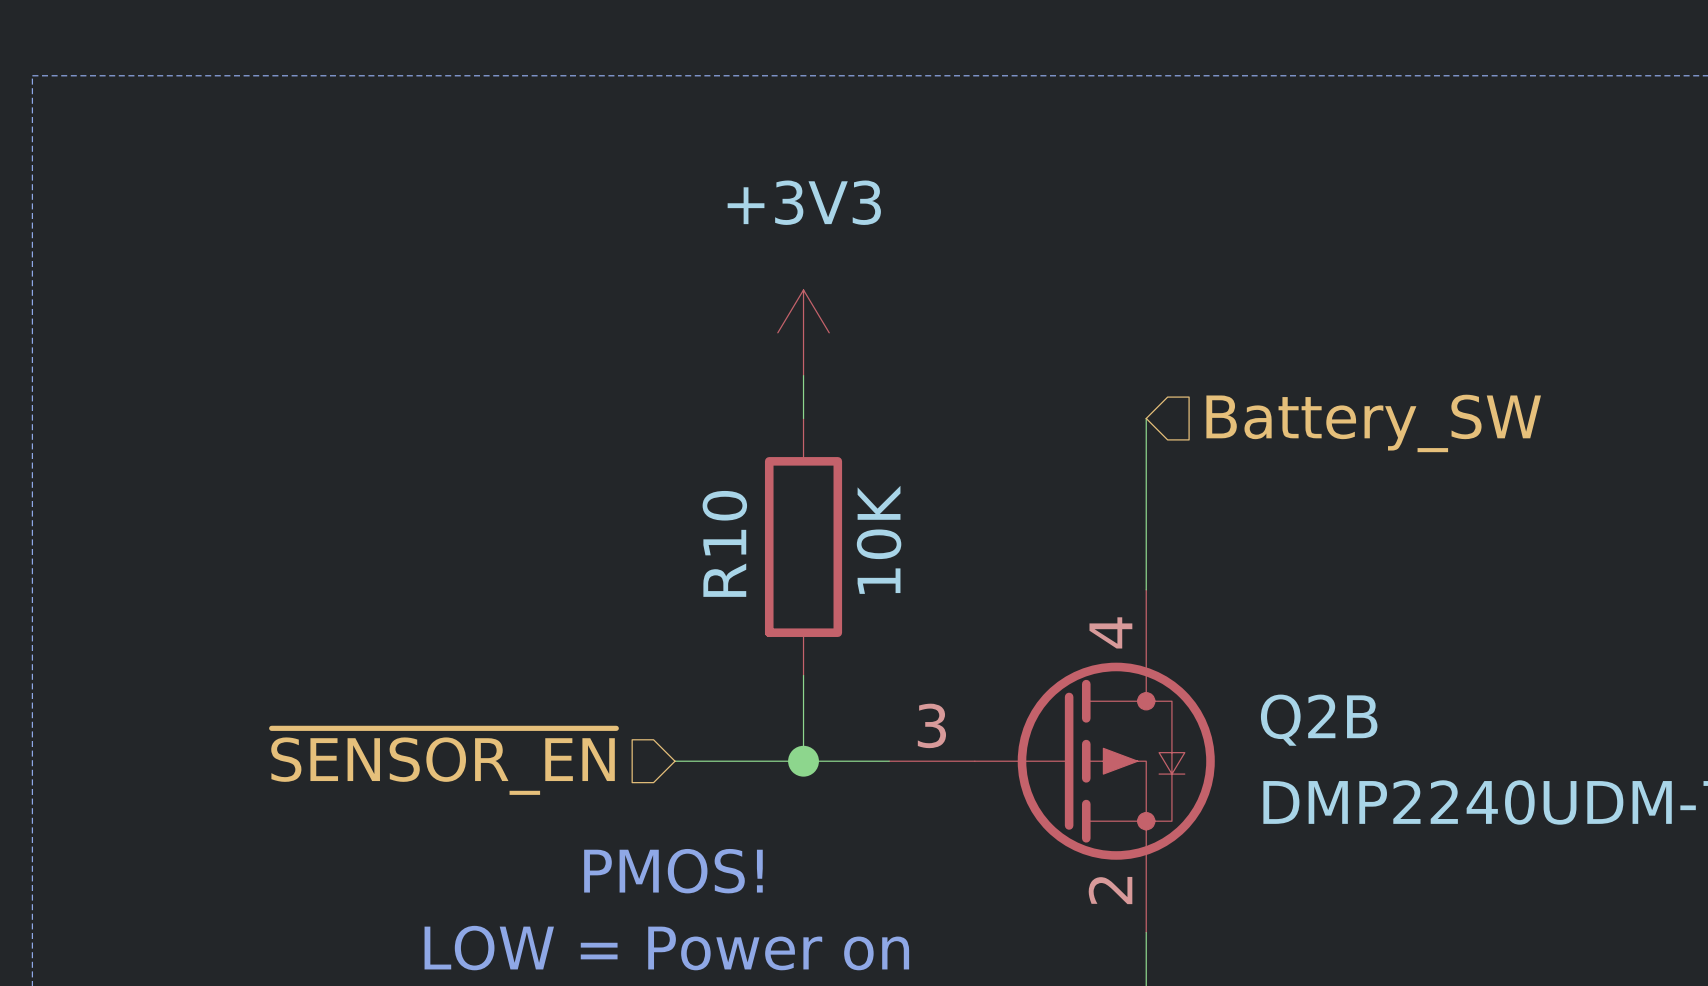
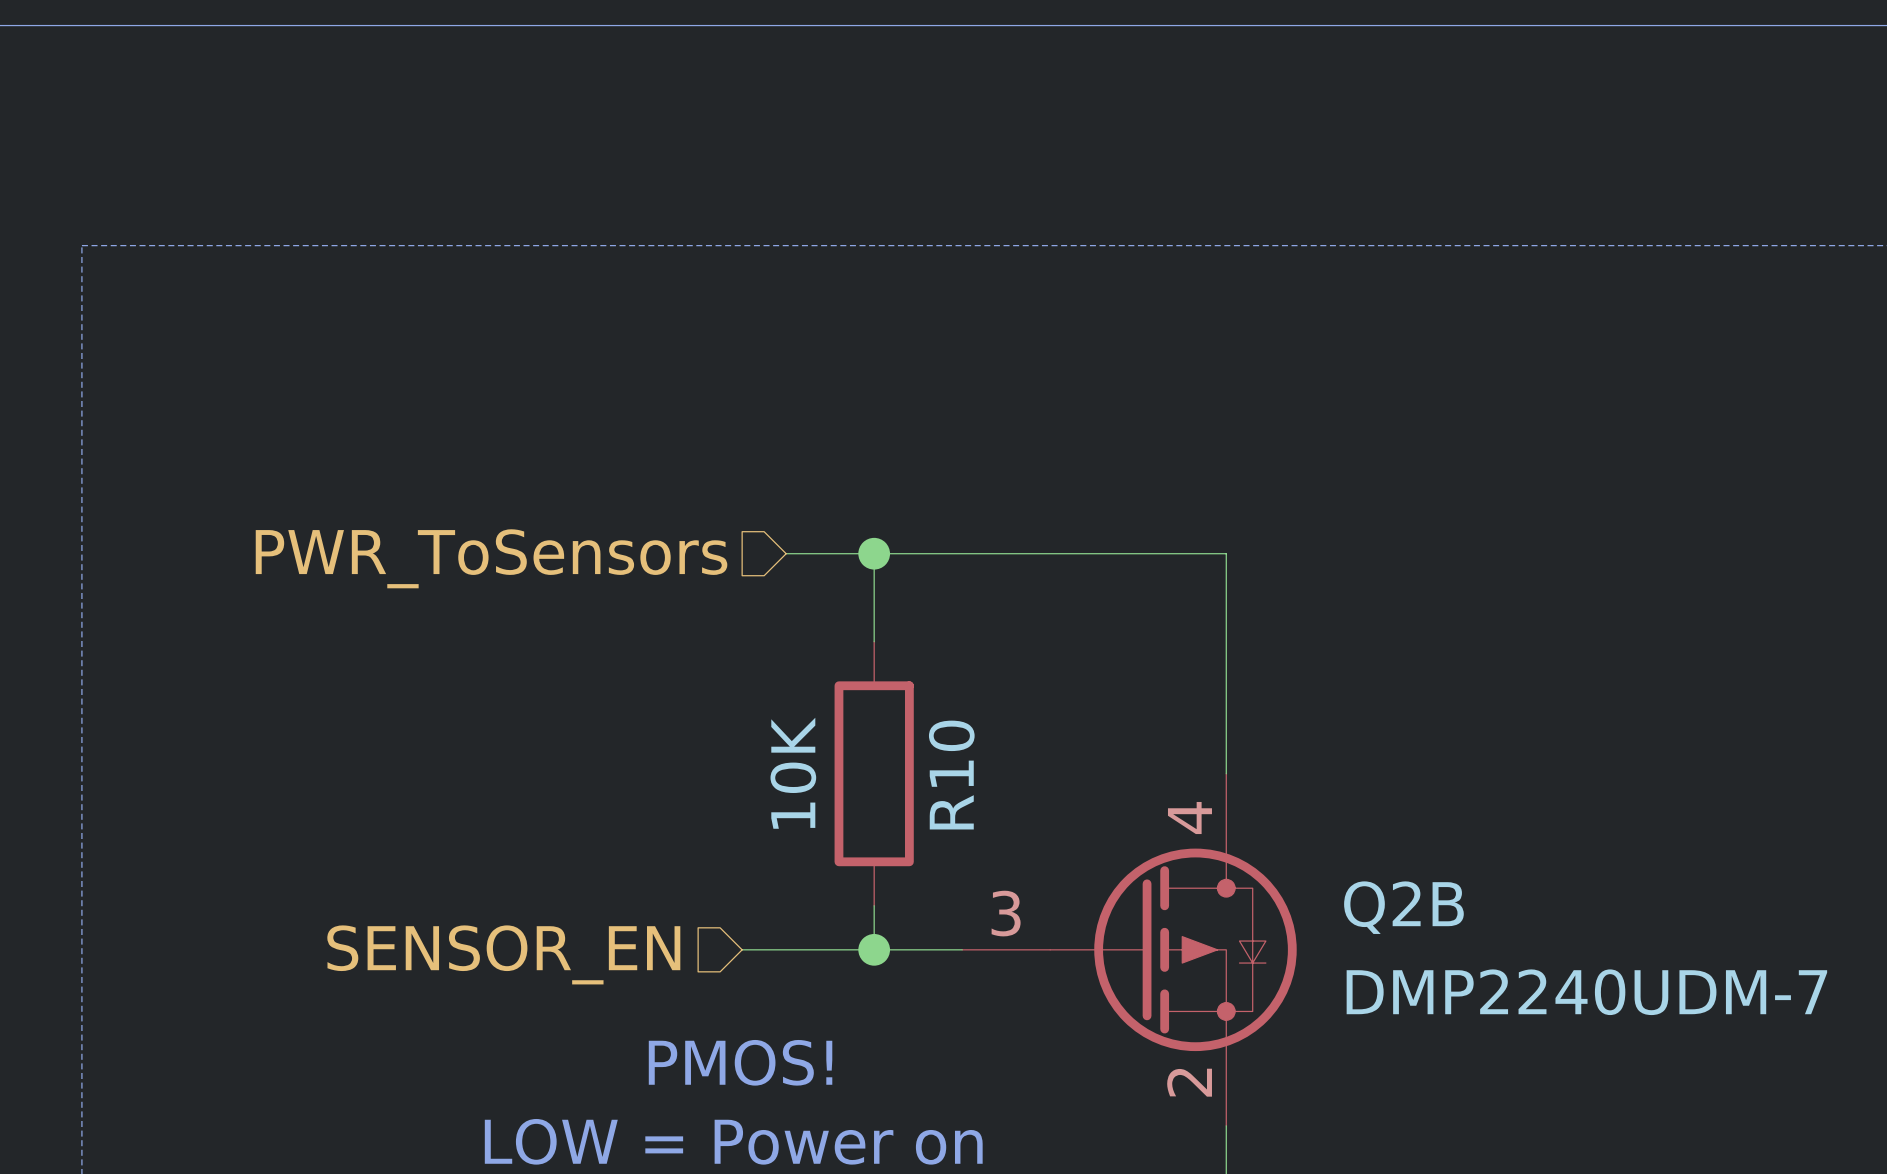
power symbol: +3V3 (803, 332) -> none
wire: none -> (786, 553) (1226, 553) (1226, 597)
junction: none -> (874, 553)
hierarchical label: none -> PWR_ToSensors (491, 558)
hierarchical label: Battery_SW (1373, 423) -> none
R10 value position: 10K (879, 539) -> 10K (793, 773)
R10 name position: R10 (724, 543) -> R10 (951, 775)
R10 position: (803, 547) -> (874, 773)
hierarchical label: ~{SENSOR_EN} (443, 761) -> SENSOR_EN (503, 954)

